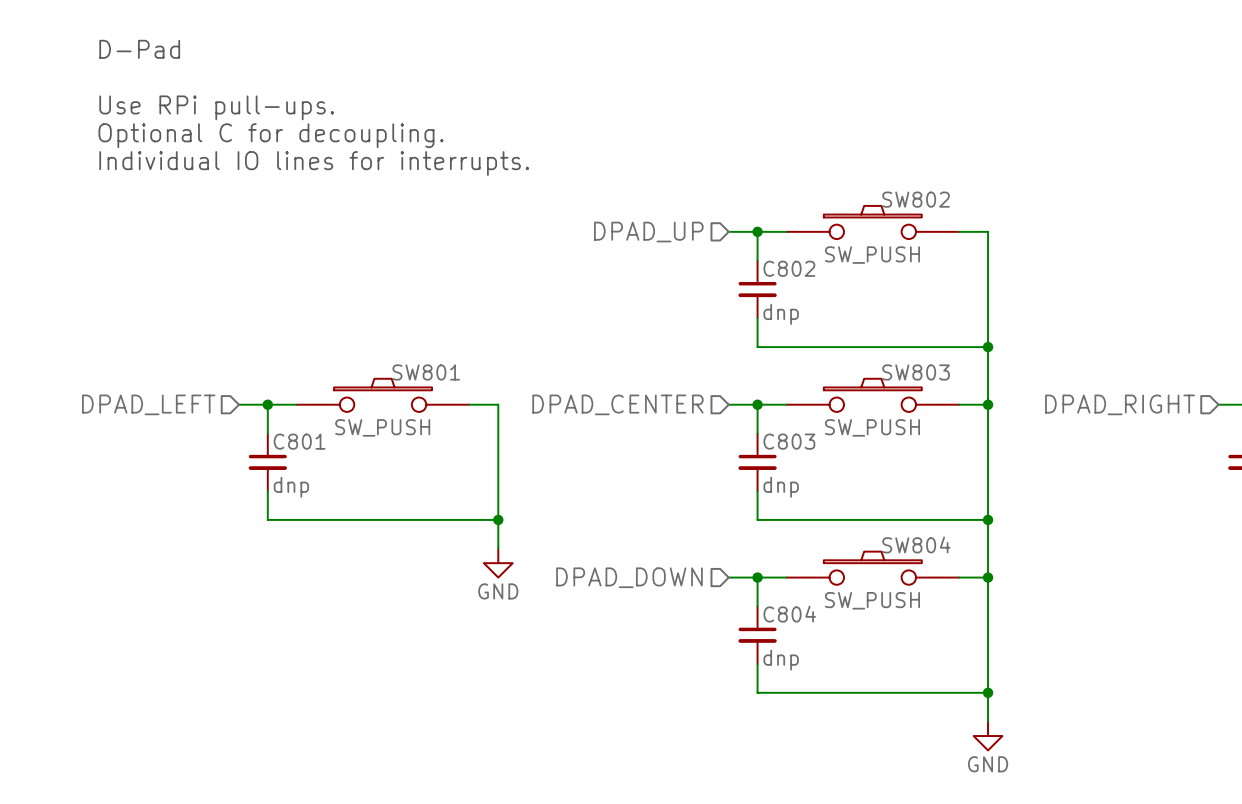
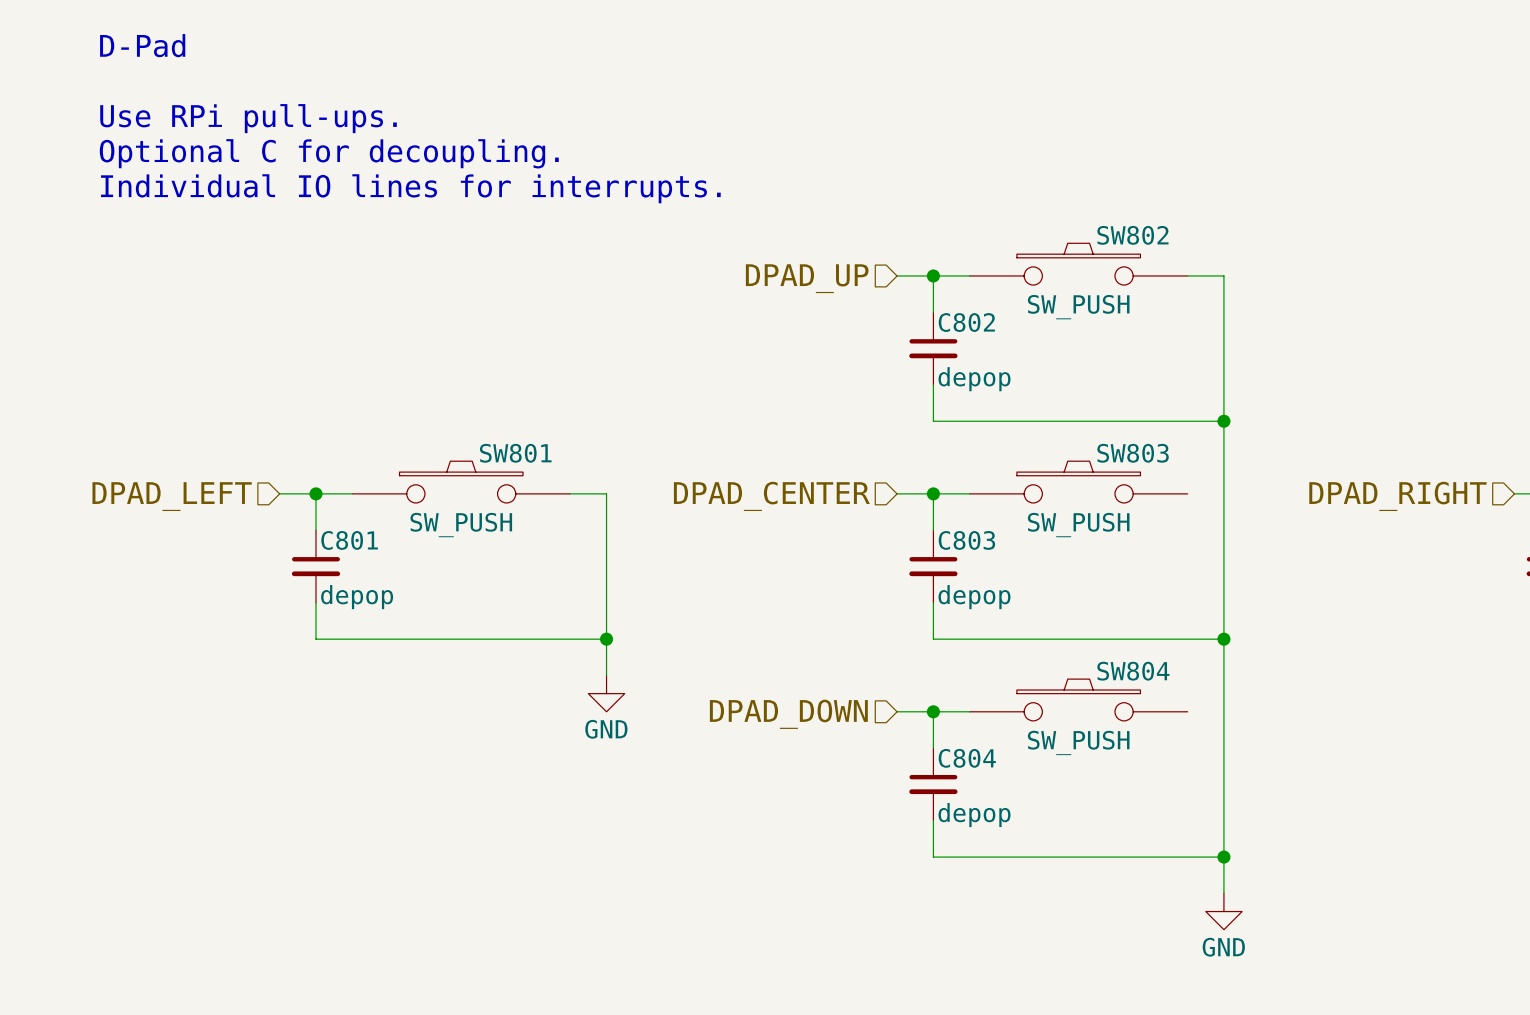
C802 value: dnp (781, 314) -> depop (974, 379)
wire: (959, 404) (988, 404) -> none
junction: (988, 404) -> none
C801 value: dnp (291, 487) -> depop (357, 597)
C803 value: dnp (781, 487) -> depop (974, 597)
wire: (959, 577) (988, 577) -> none
junction: (988, 577) -> none
C804 value: dnp (781, 660) -> depop (974, 815)

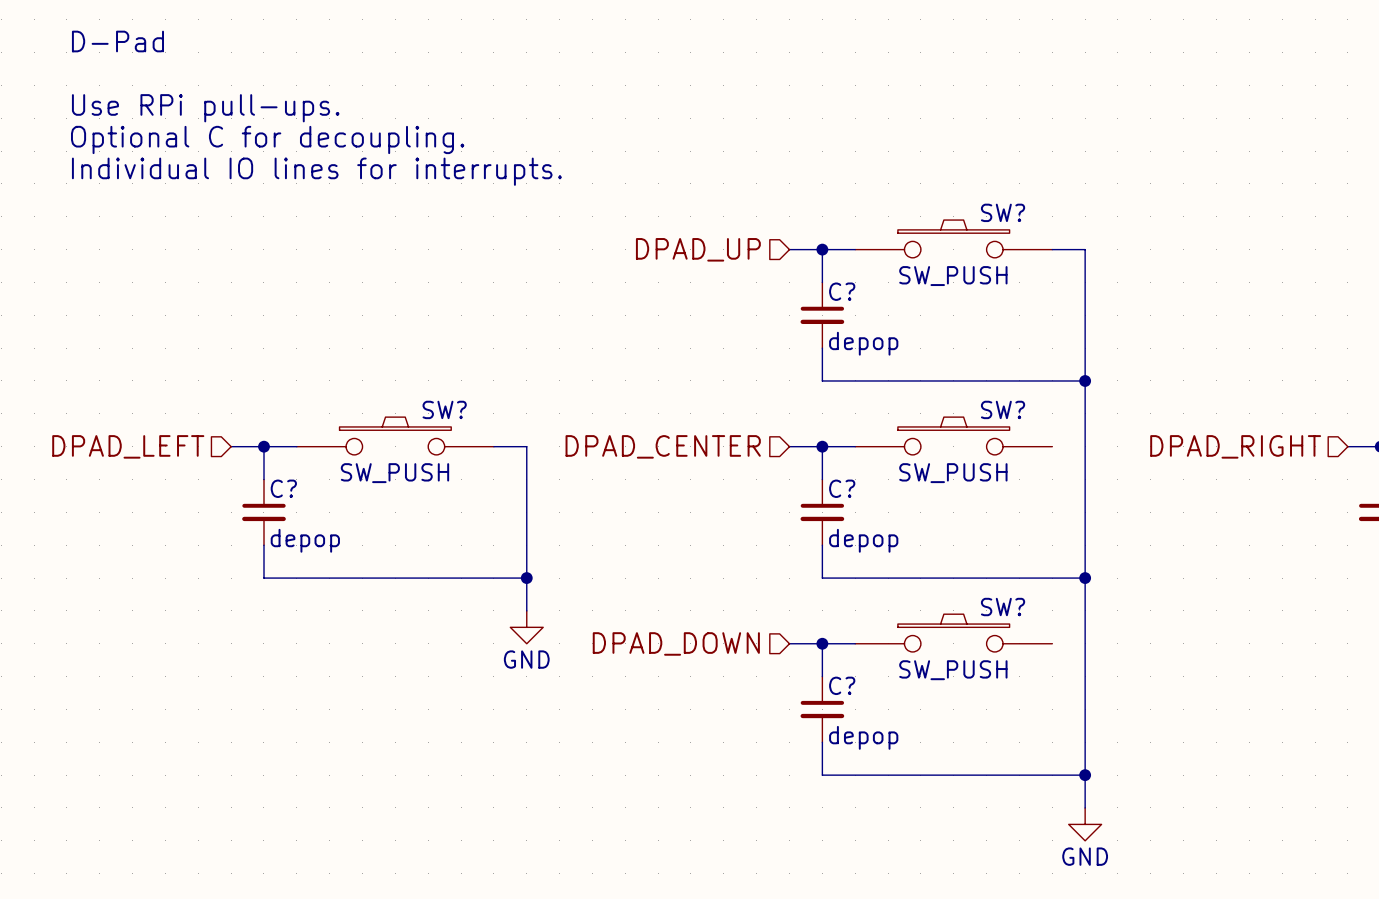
SW802 name: SW802 (1132, 235) -> SW? (1003, 212)
C802 name: C802 (966, 322) -> C? (842, 291)
SW801 name: SW801 (515, 453) -> SW? (444, 409)
SW803 name: SW803 (1133, 453) -> SW? (1003, 409)
C801 name: C801 (349, 540) -> C? (283, 488)
C803 name: C803 (966, 540) -> C? (842, 488)
SW804 name: SW804 (1133, 671) -> SW? (1003, 607)
C804 name: C804 (967, 758) -> C? (842, 685)

